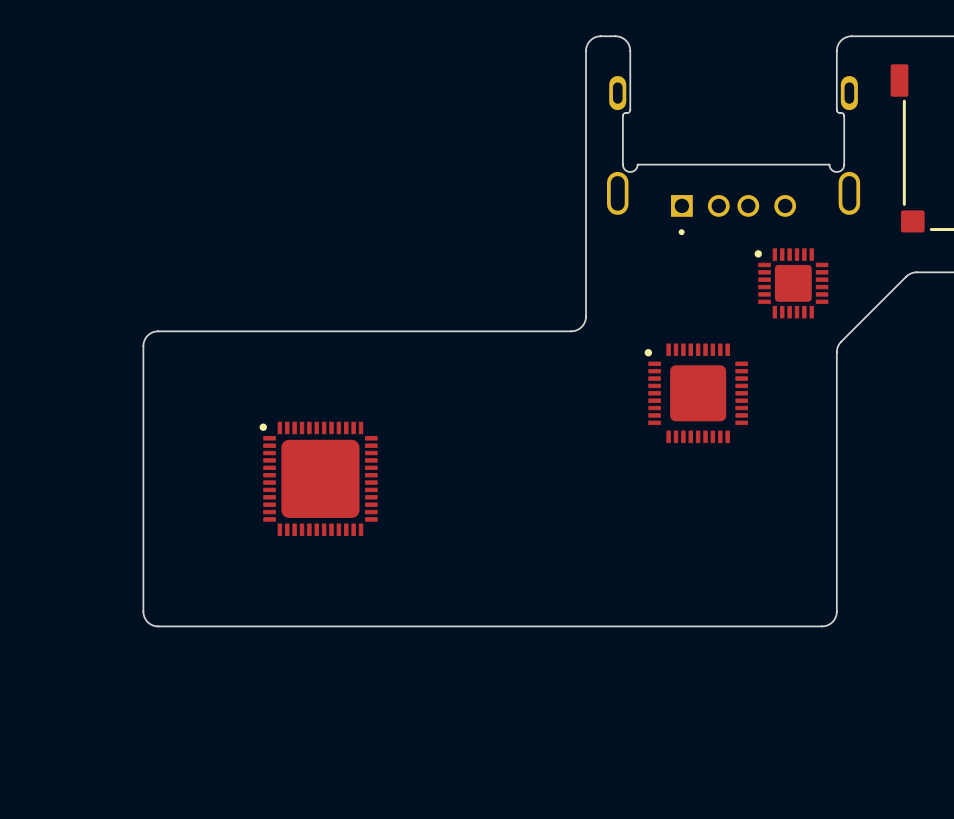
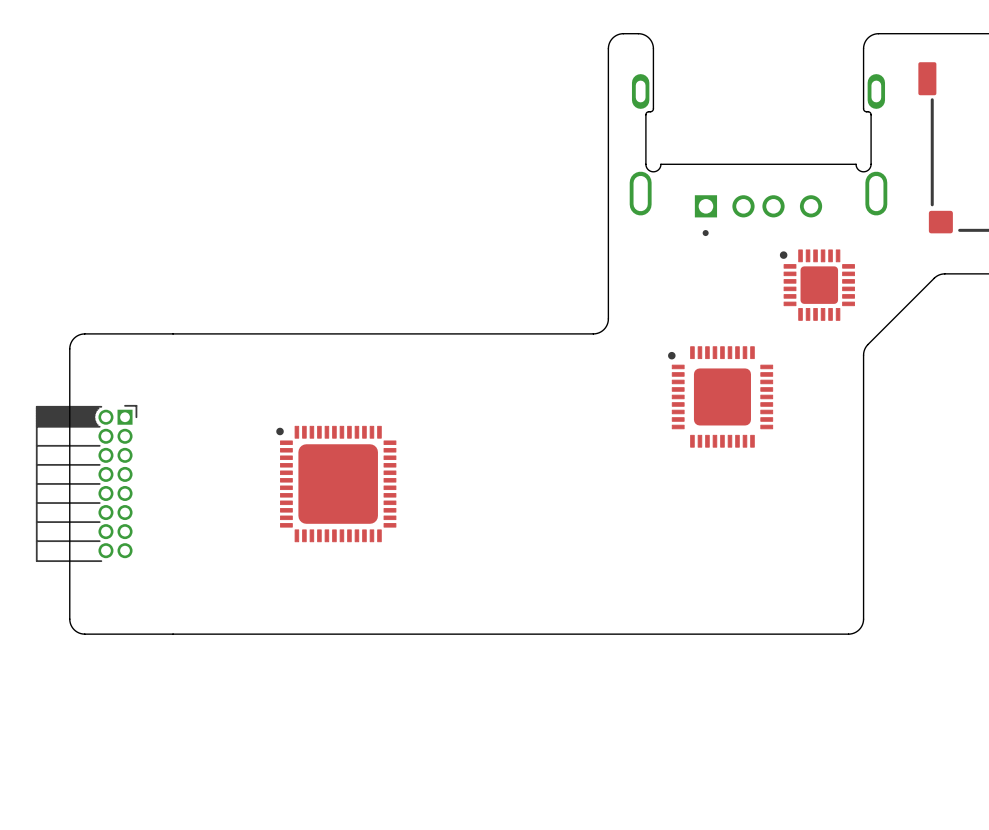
board edge: (158, 331) (147, 335) (143, 346) (143, 611) (147, 622) (158, 626) -> (173, 333) (82, 334) (72, 339) (69, 348) (70, 624) (75, 631) (82, 634) (173, 634)
part: none -> (86, 483)

